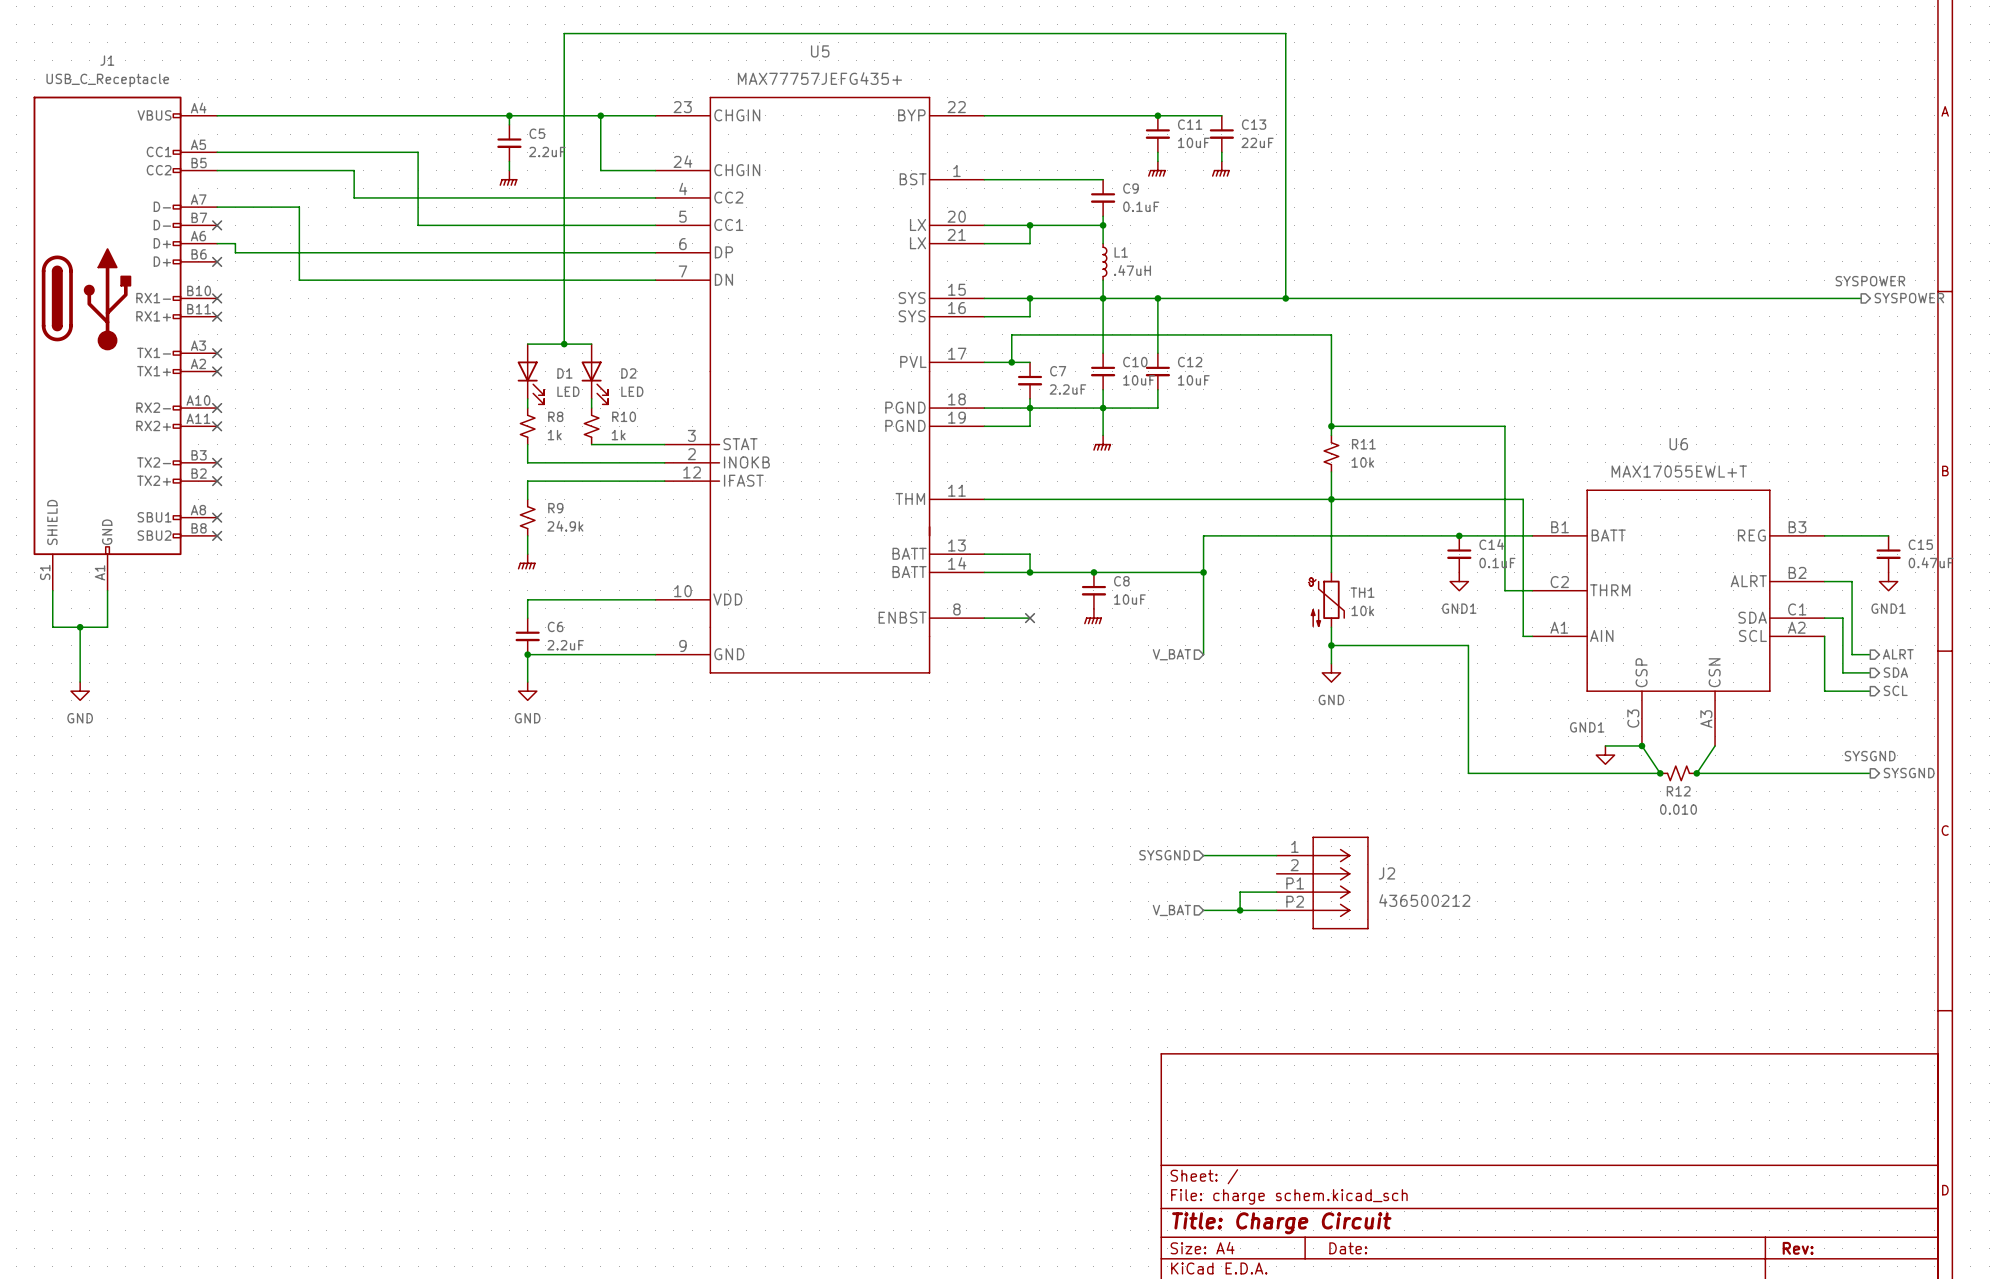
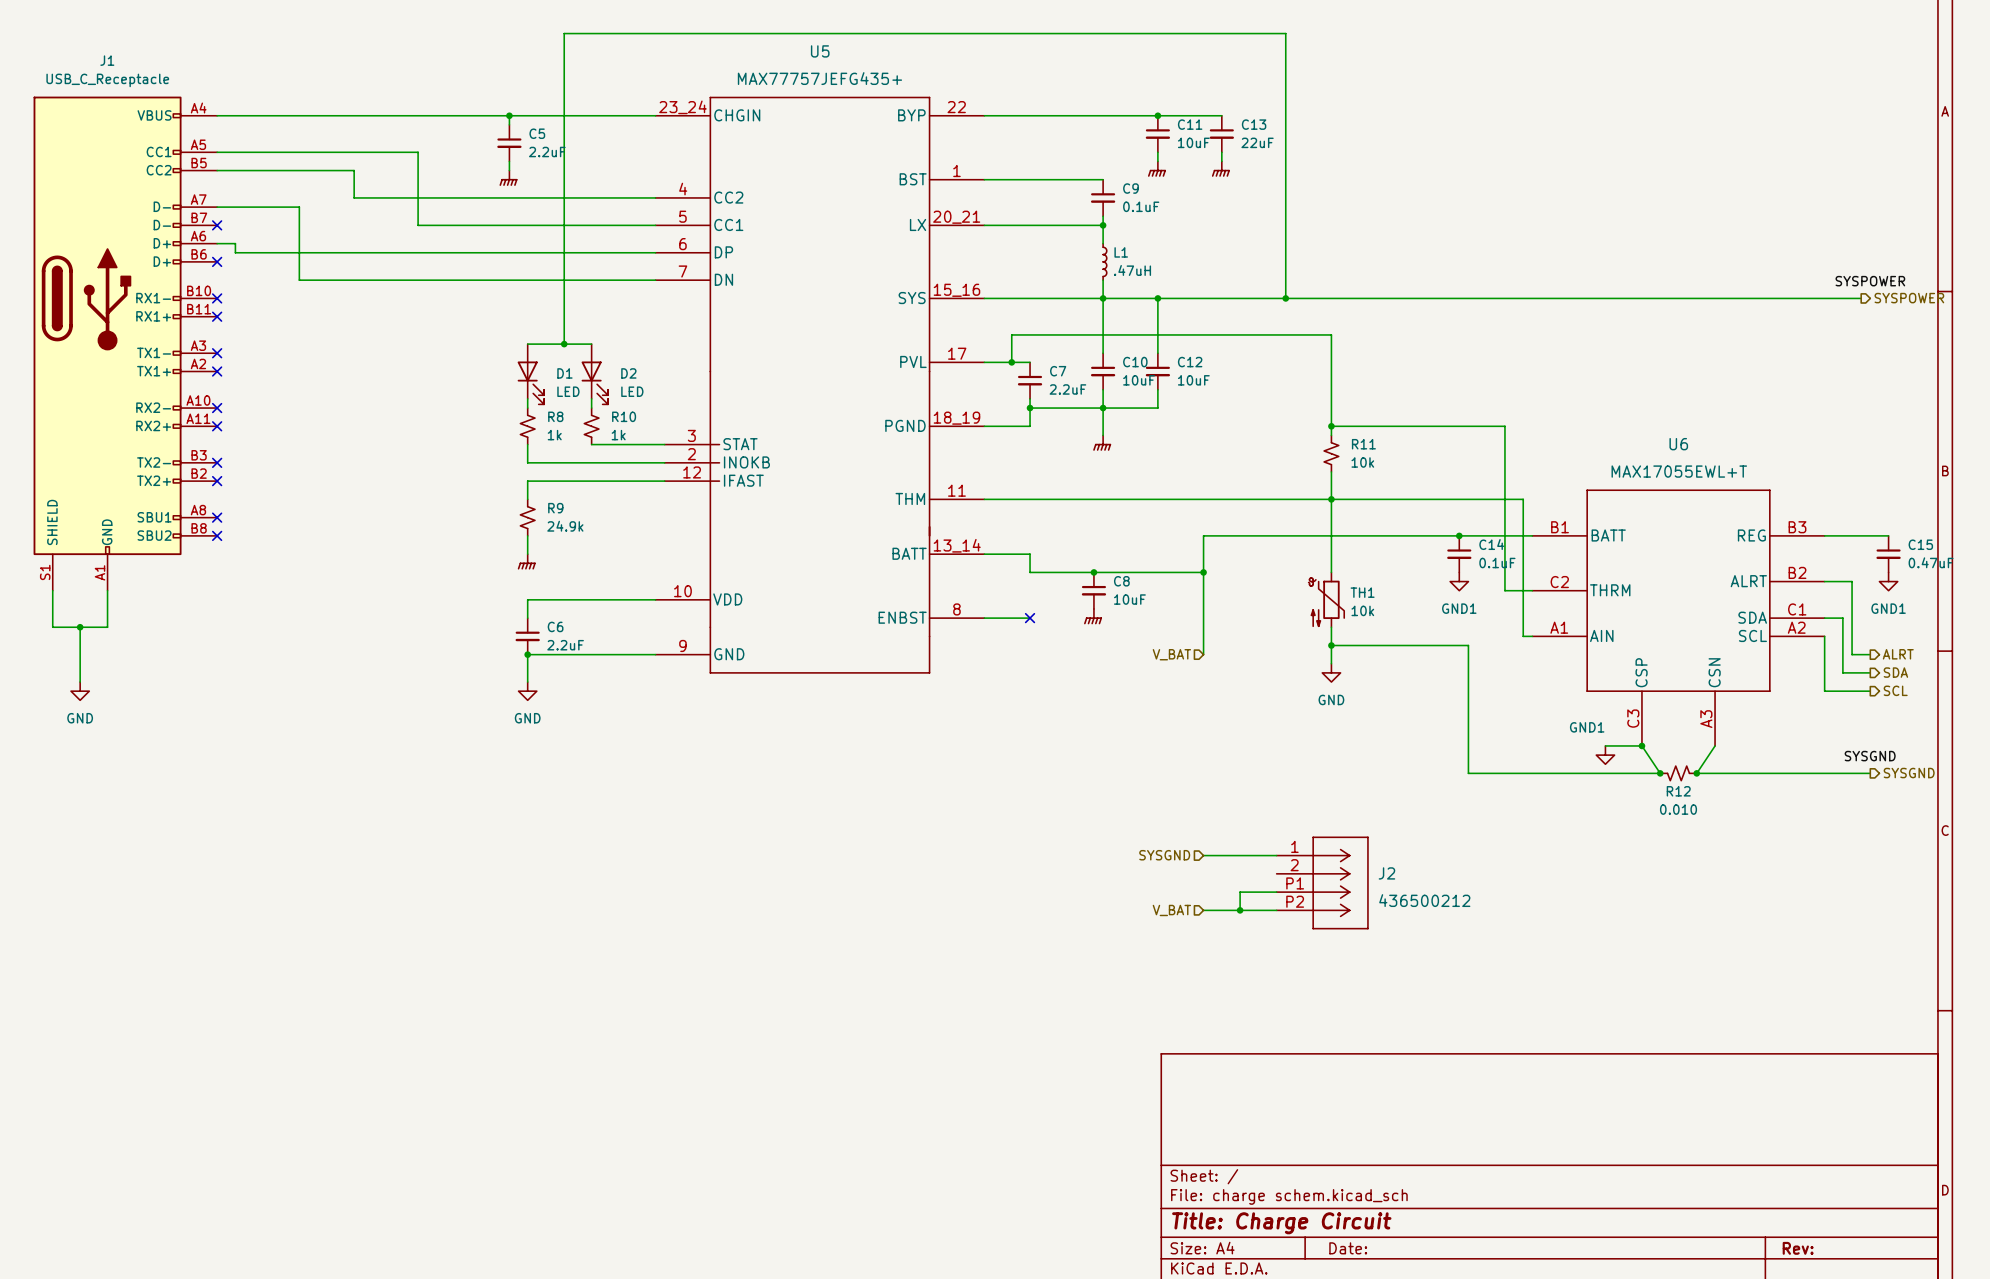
U5 symbol: [655, 97, 985, 674] -> [655, 97, 985, 674]
wire: (600, 115) (600, 170) (655, 170) -> none
junction: (600, 115) -> none
wire: (1030, 225) (1030, 243) (984, 243) -> none
junction: (1030, 225) -> none
wire: (1030, 298) (1030, 316) (984, 316) -> none
junction: (1030, 298) -> none
wire: (984, 408) (1030, 408) -> none
wire: (984, 572) (1030, 572) -> none
junction: (1030, 572) -> none

